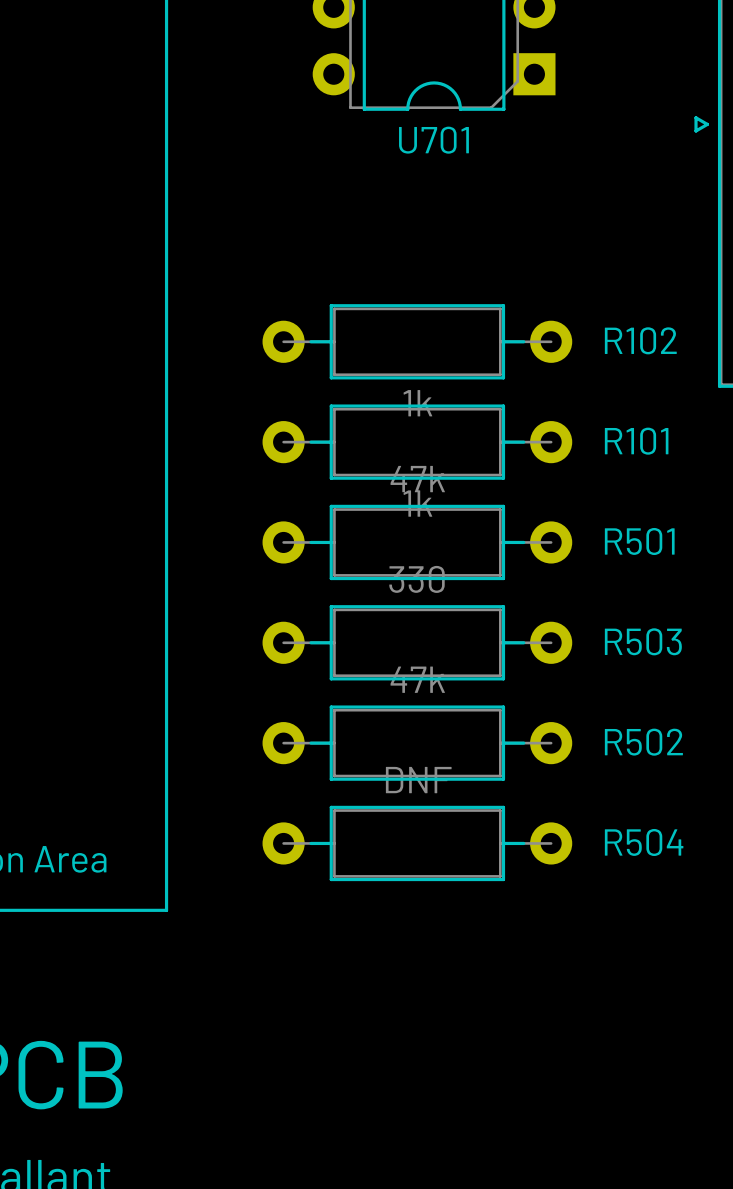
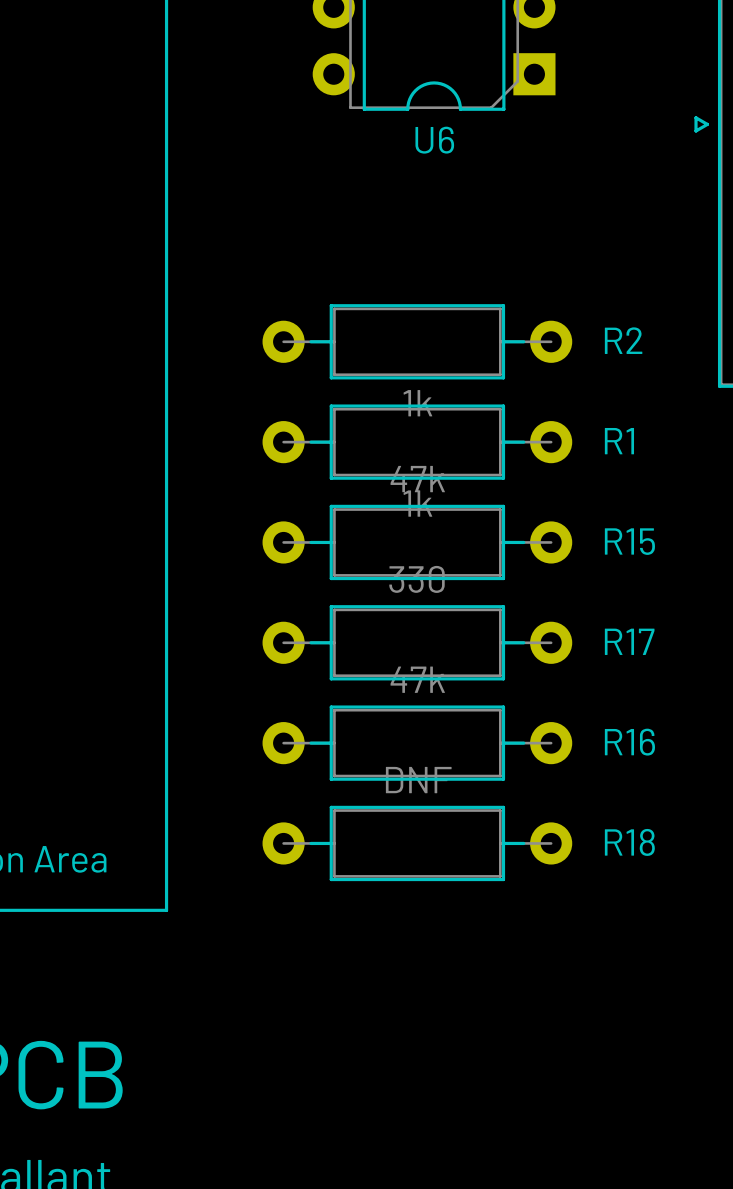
U701 name: U701 (433, 140) -> U6 (434, 140)
R102 name: R102 (640, 340) -> R2 (623, 340)
R101 name: R101 (636, 441) -> R1 (619, 441)
R501 name: R501 (639, 541) -> R15 (629, 541)
R503 name: R503 (643, 641) -> R17 (629, 641)
R502 name: R502 (643, 742) -> R16 (629, 742)
R504 name: R504 (644, 842) -> R18 (629, 842)

